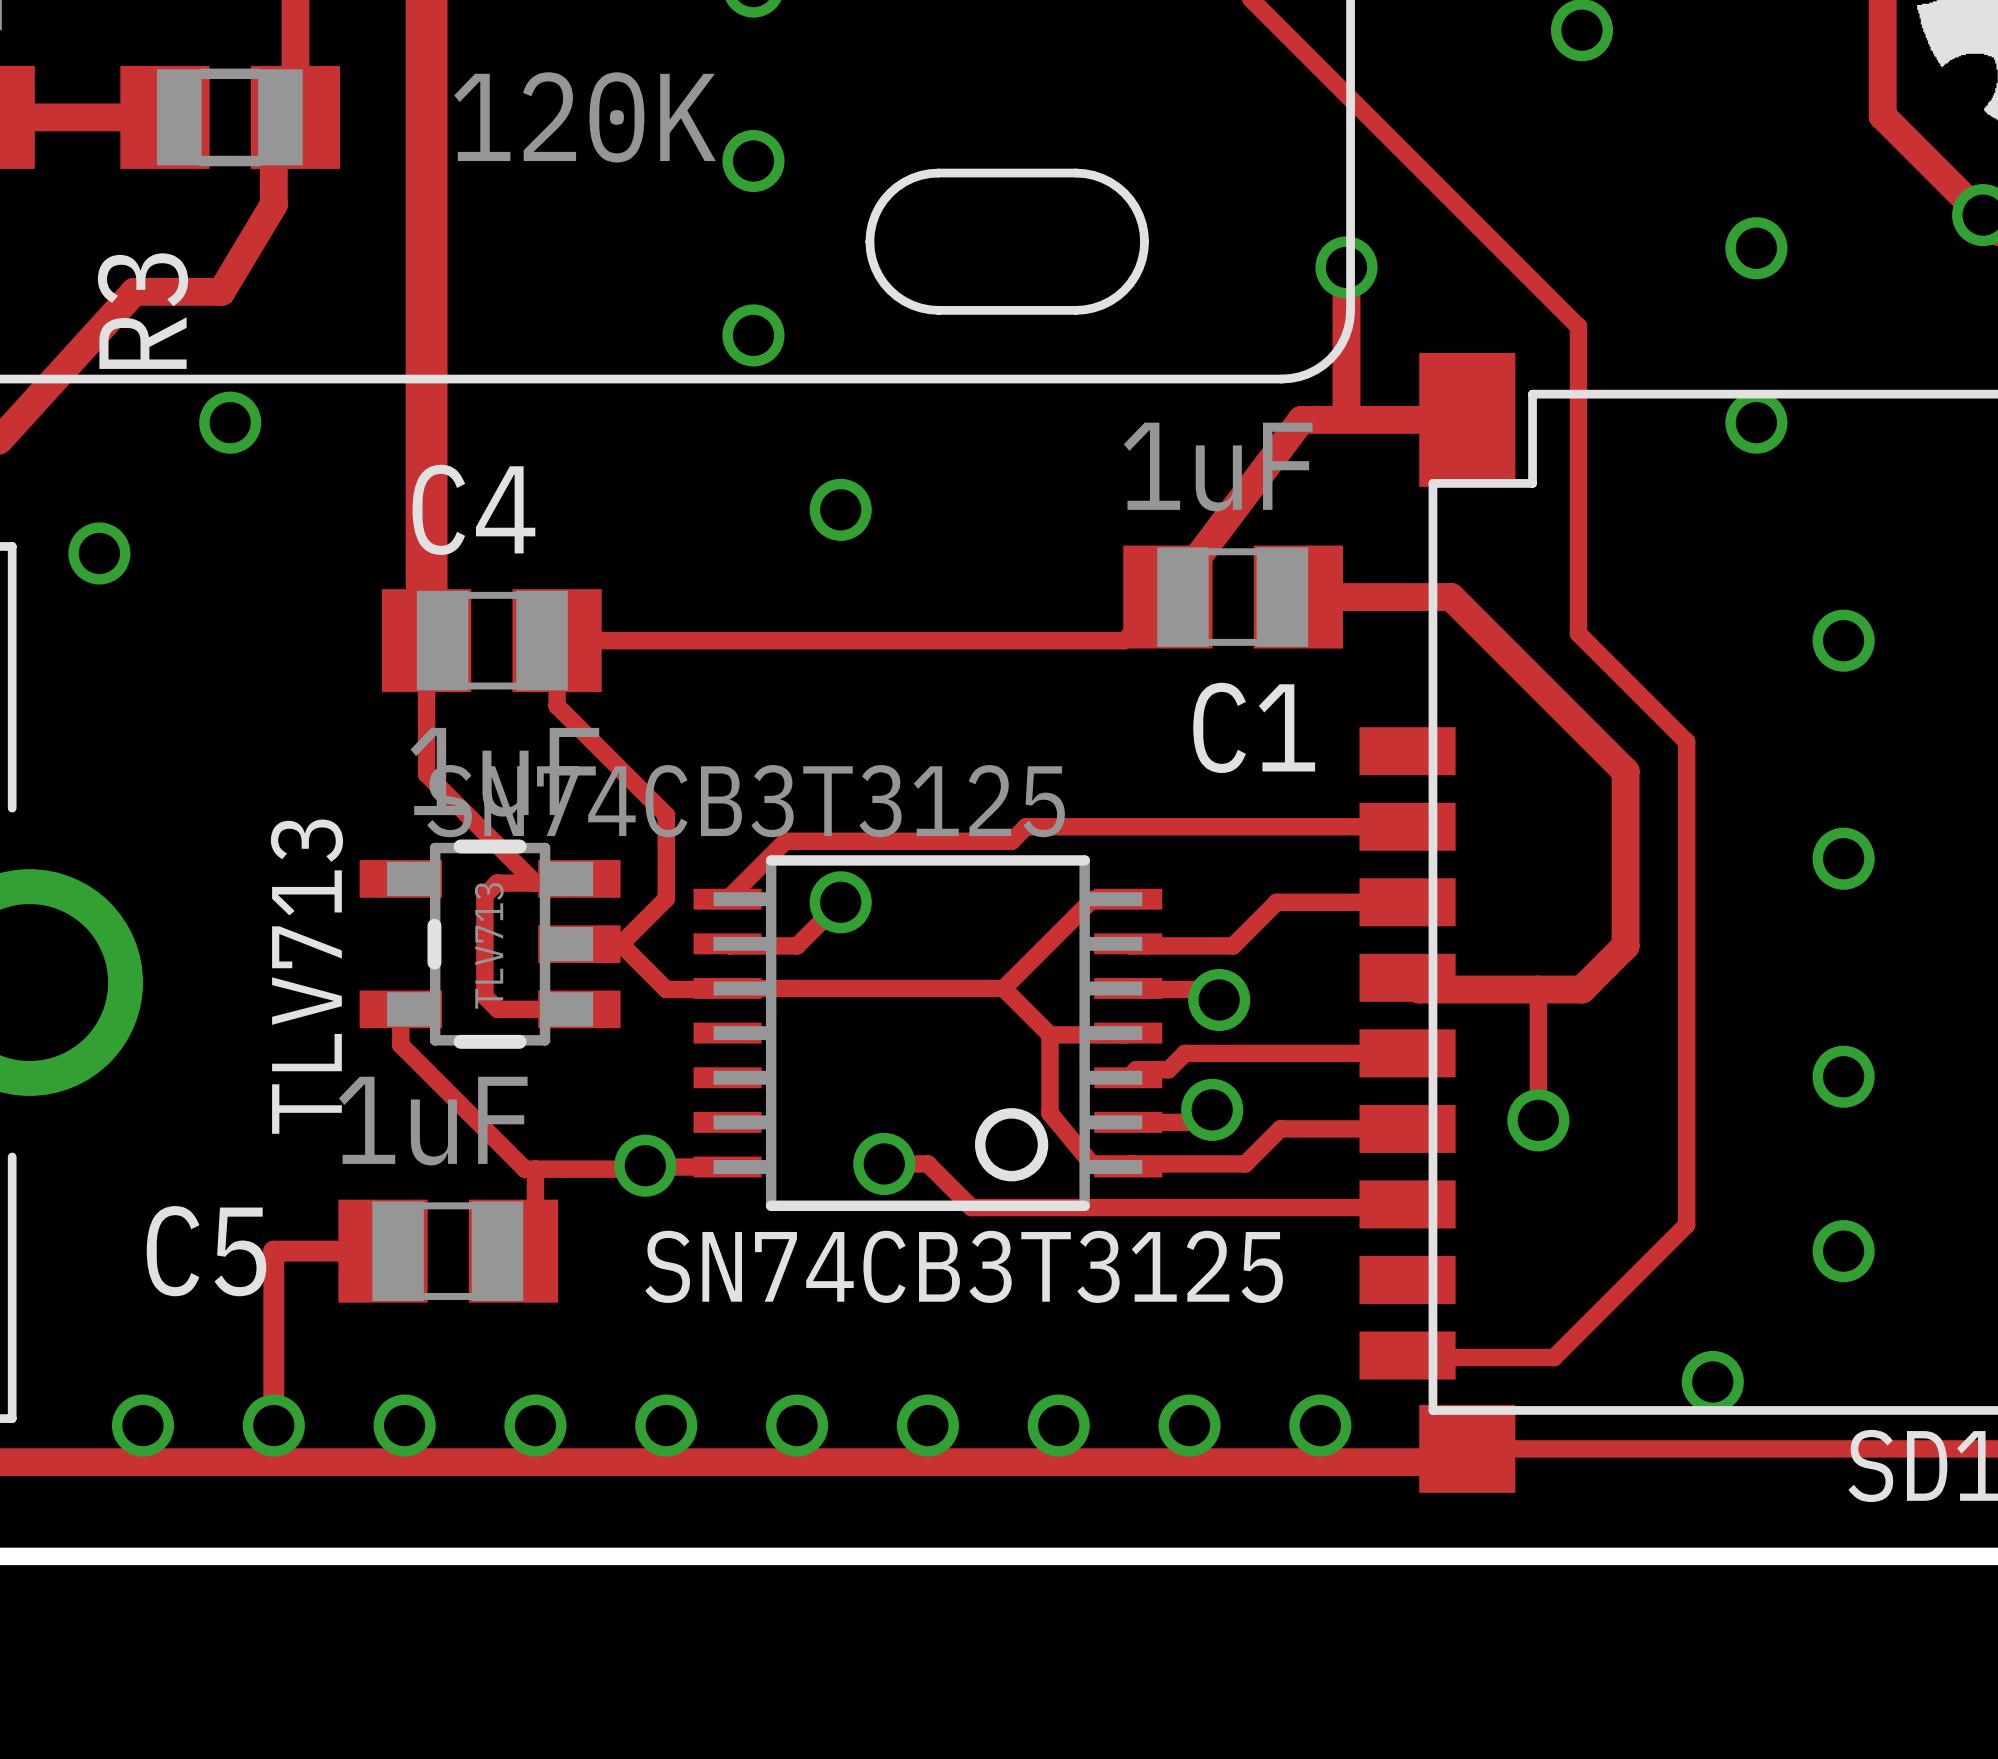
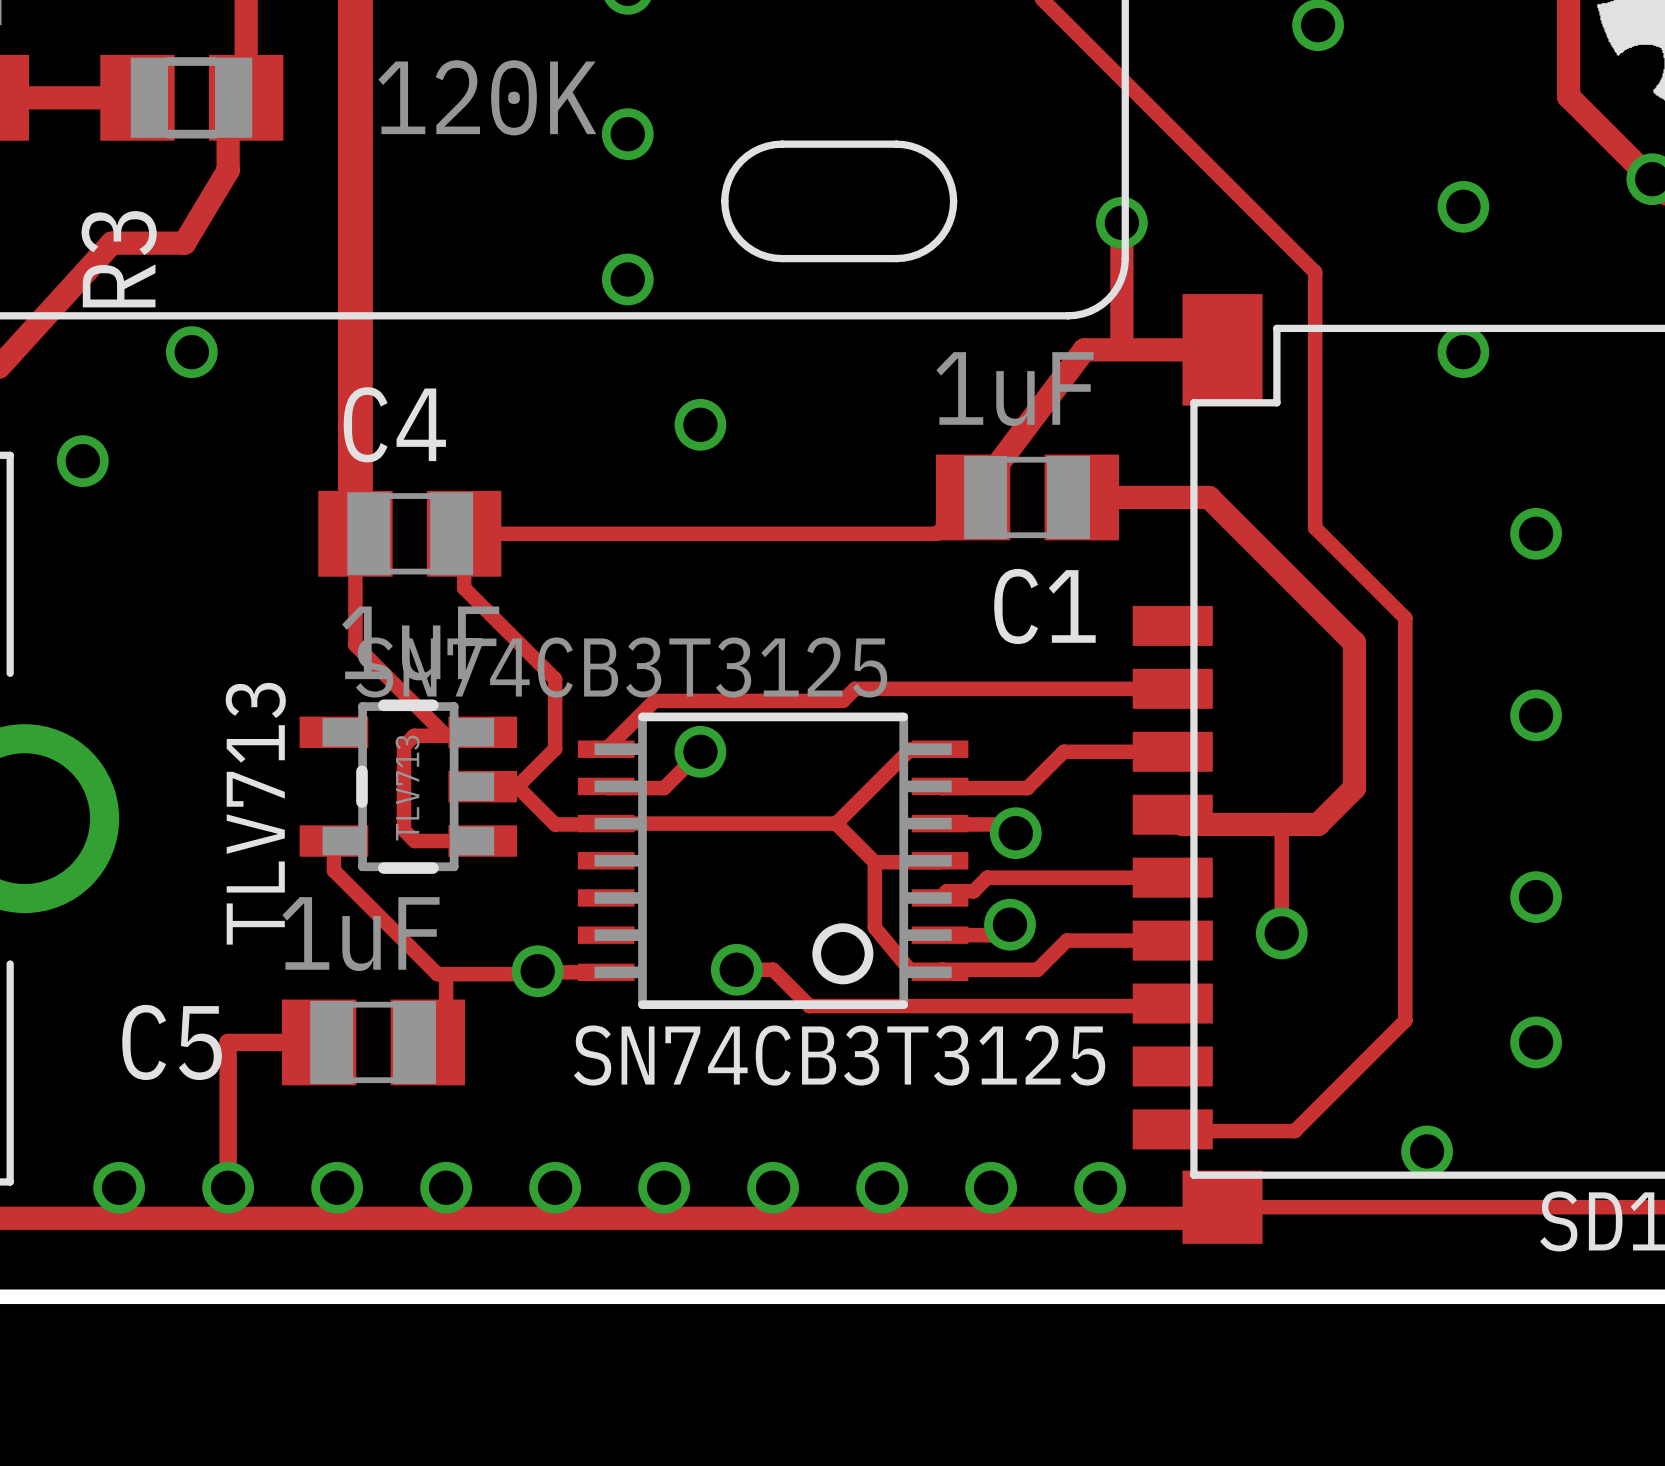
SN74CB3T3125 name position: SN74CB3T3125 (964, 1266) -> SN74CB3T3125 (839, 1055)

